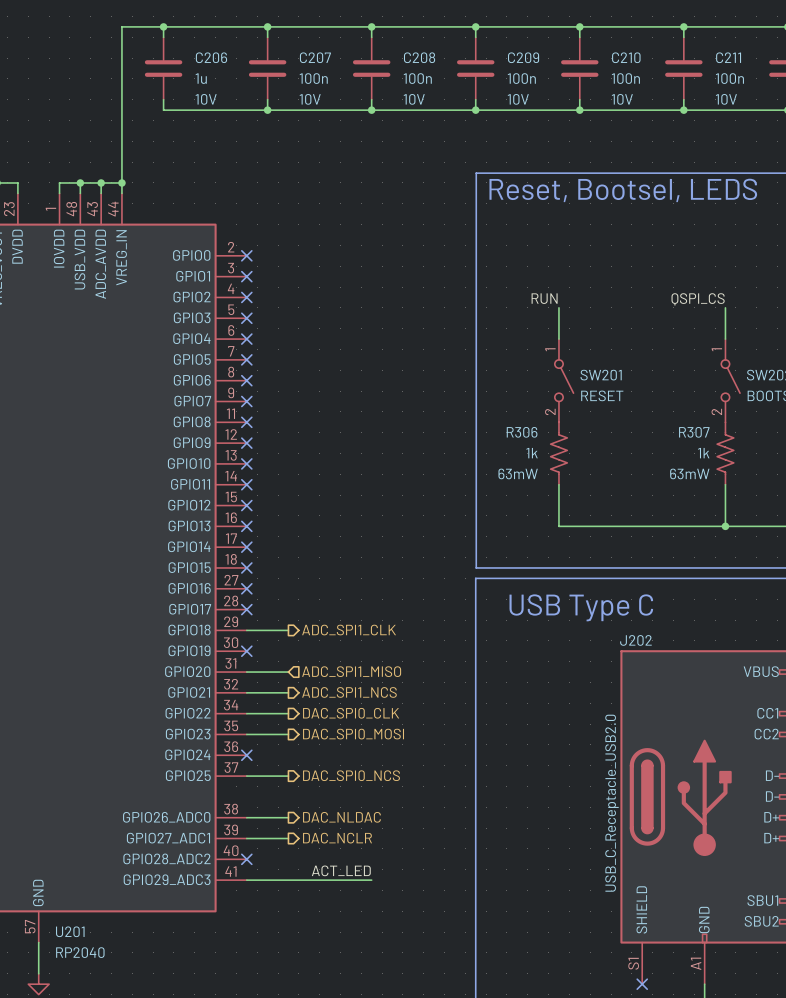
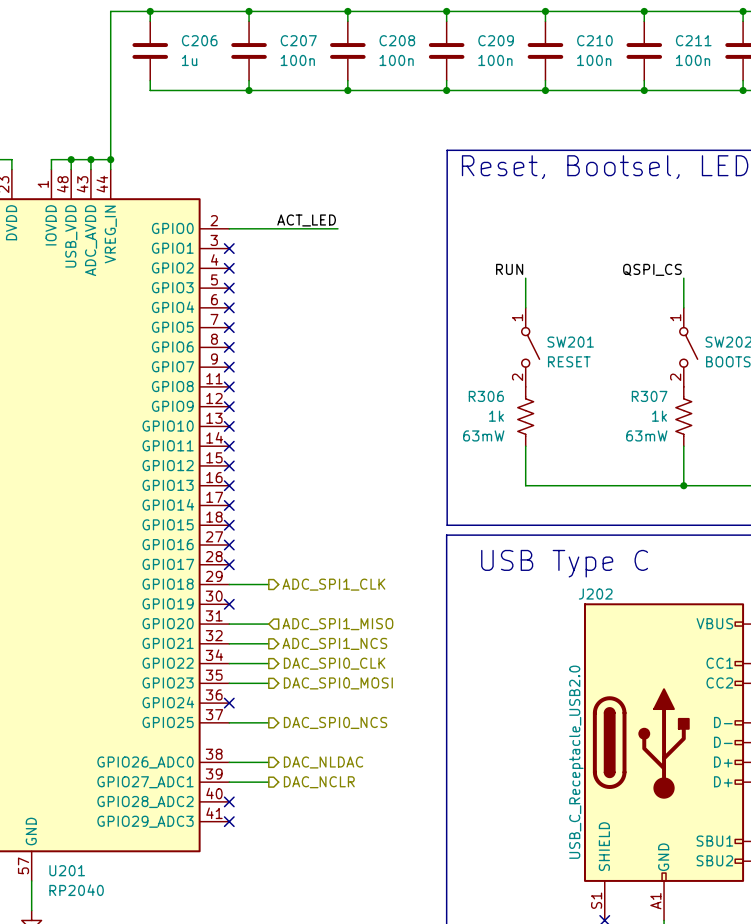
C206 text: 10V (206, 99) -> none
C207 text: 10V (310, 99) -> none
C208 text: 10V (414, 99) -> none
C209 text: 10V (518, 99) -> none
C210 text: 10V (622, 99) -> none
C211 text: 10V (726, 99) -> none
label: none -> ACT_LED (306, 220)
wire: none -> (229, 228) (337, 228)
no-connect mark: (246, 255) -> none
label: ACT_LED (341, 870) -> none
wire: (246, 880) (371, 880) -> none
no-connect mark: none -> (229, 821)

